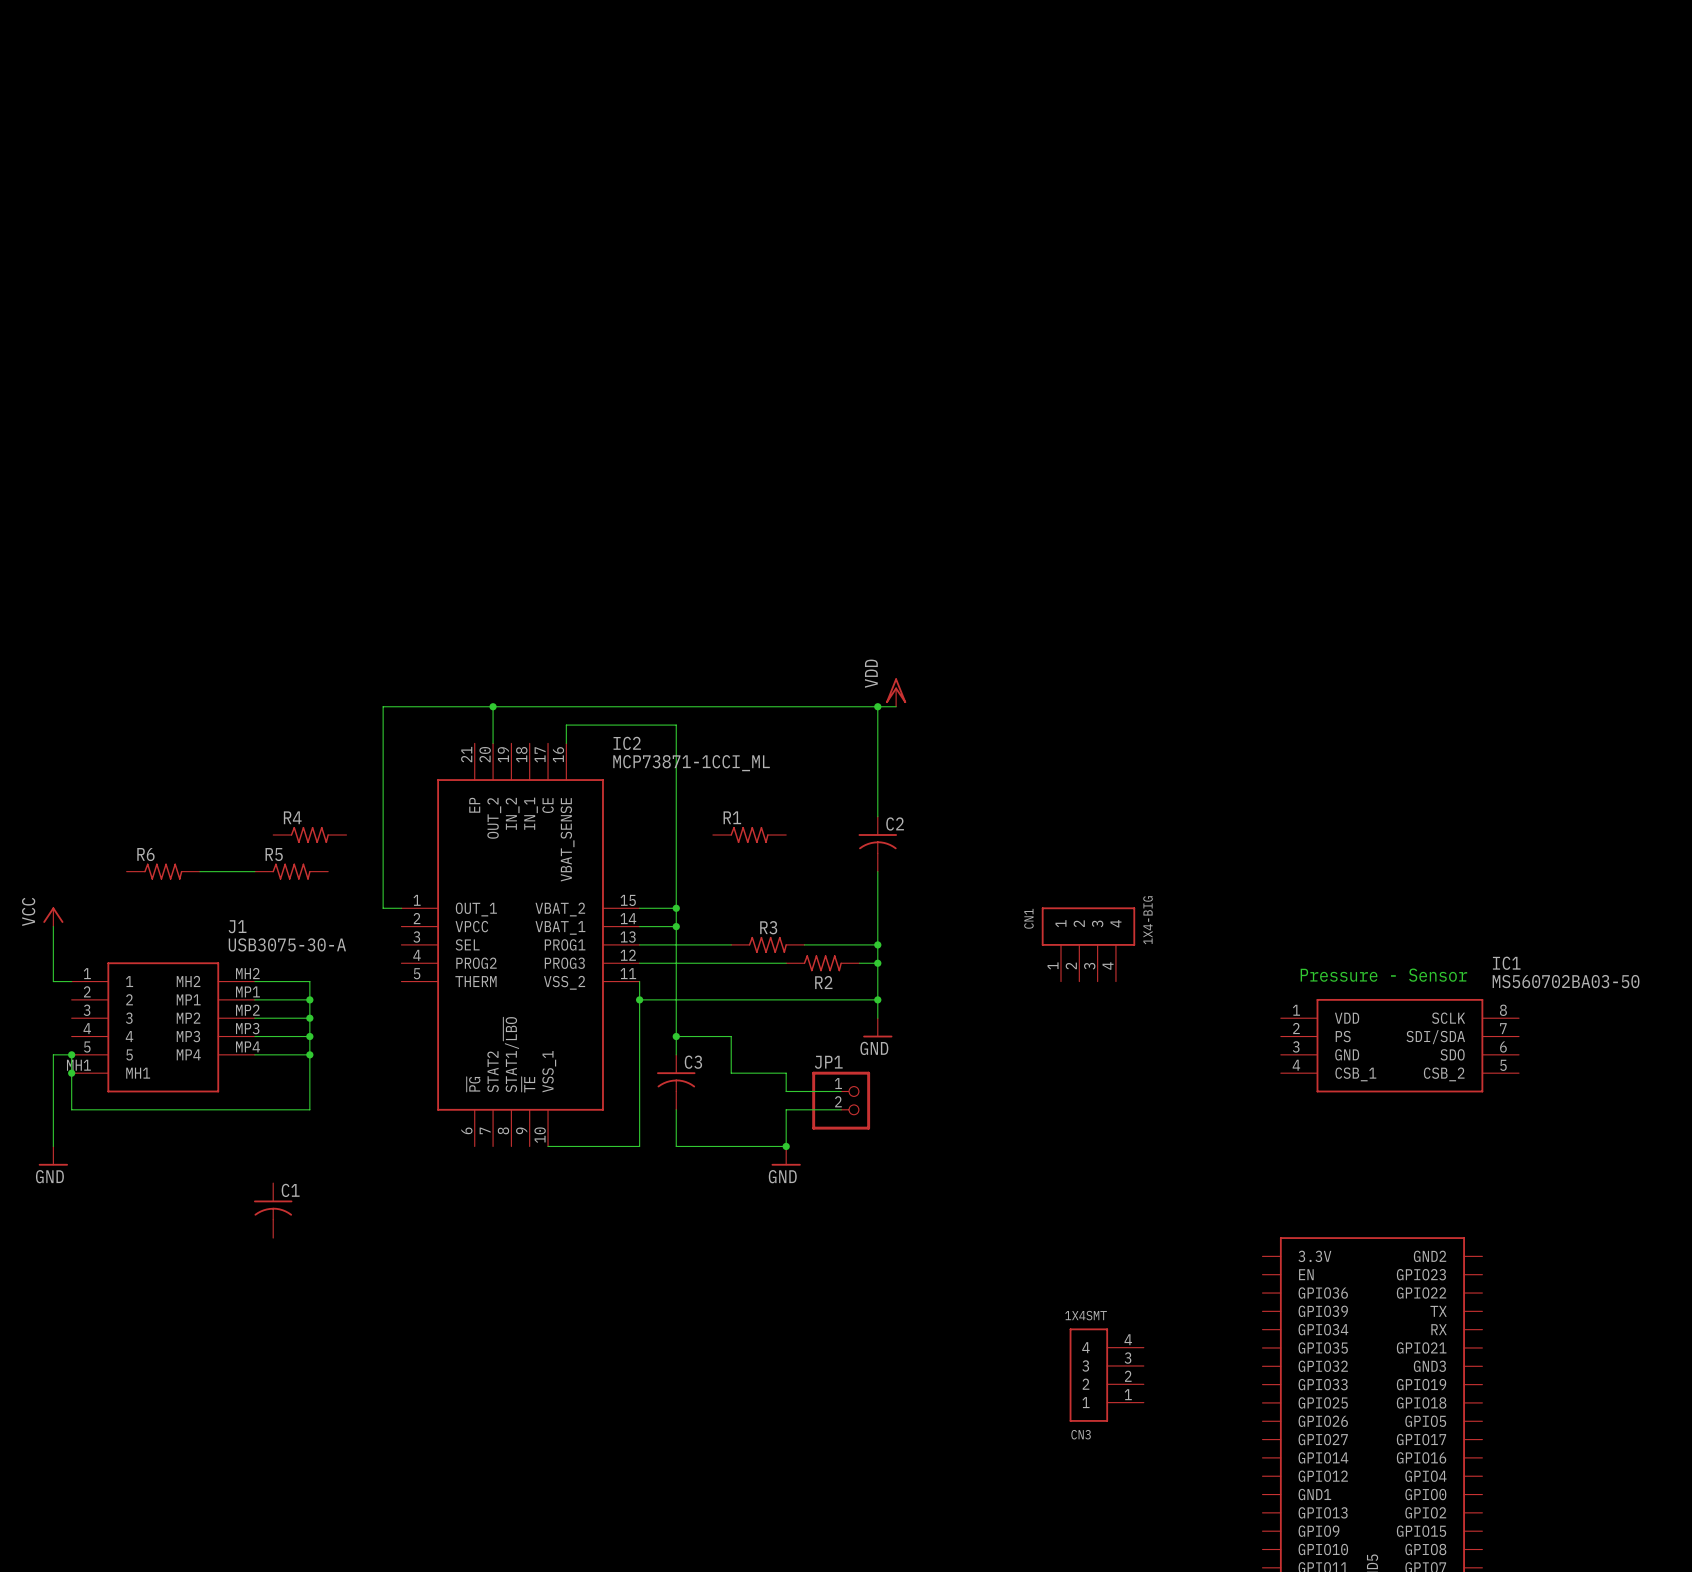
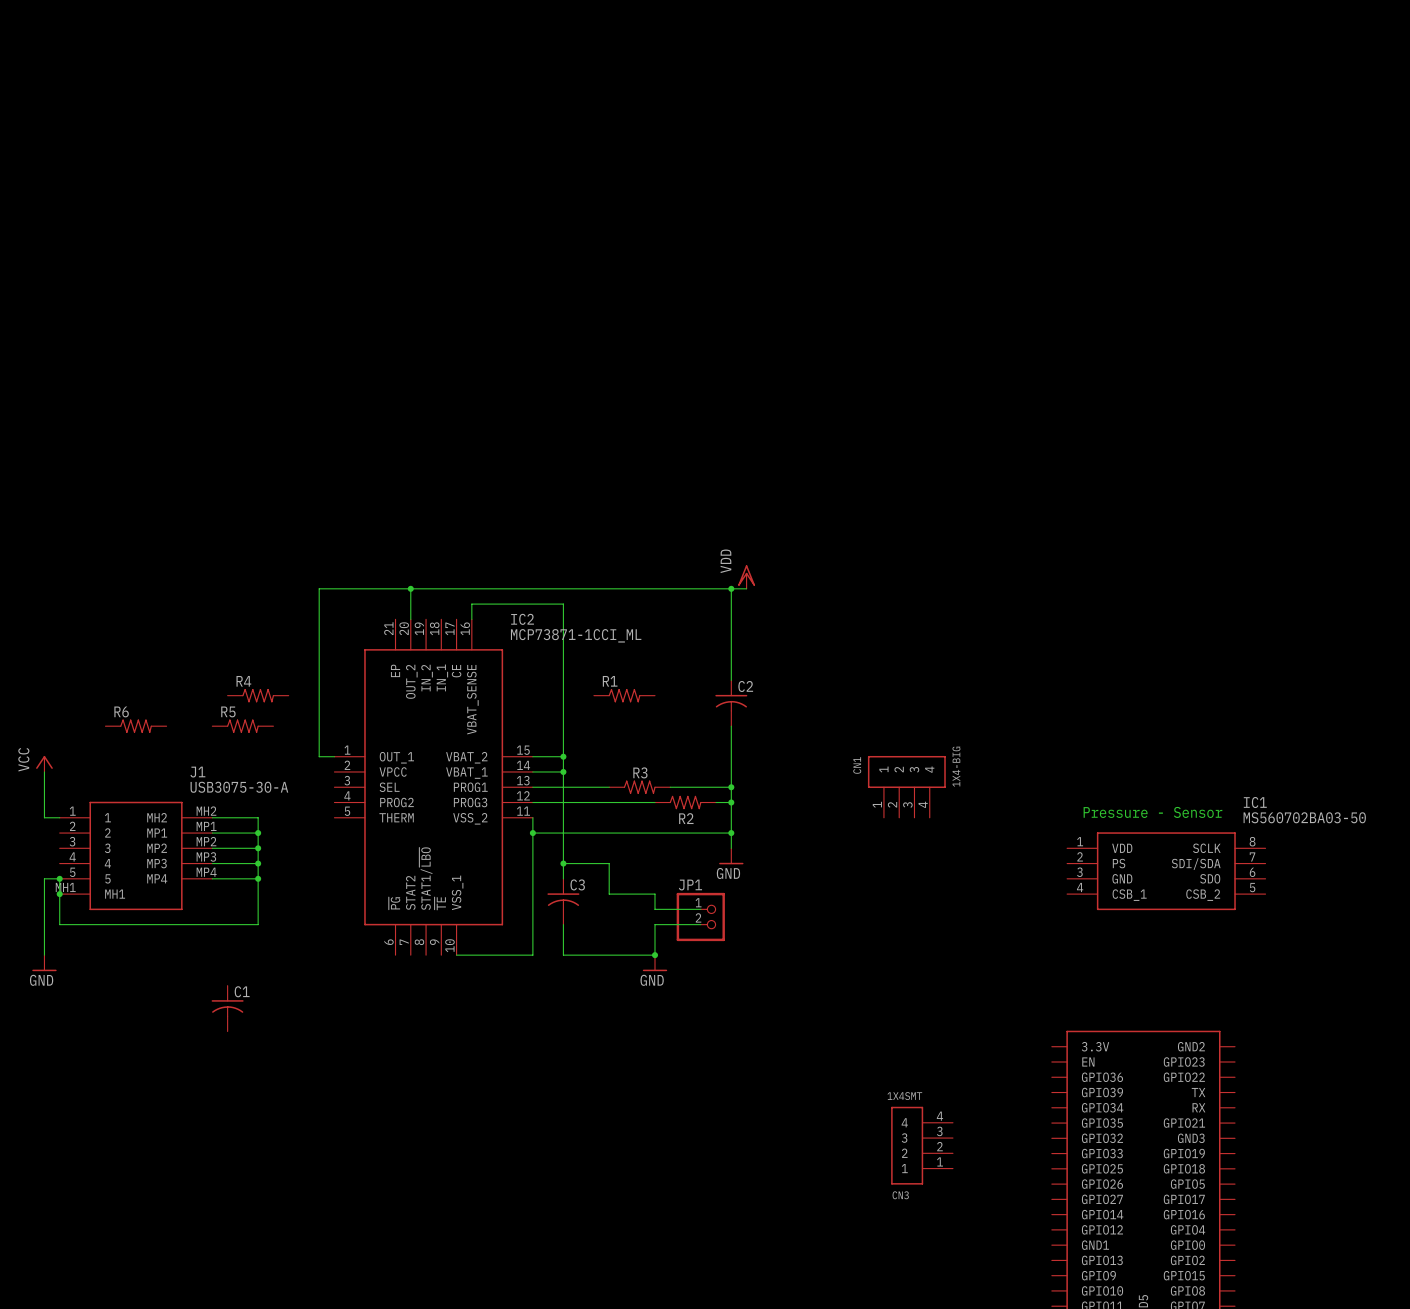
wire: (199, 871) (254, 871) -> none

